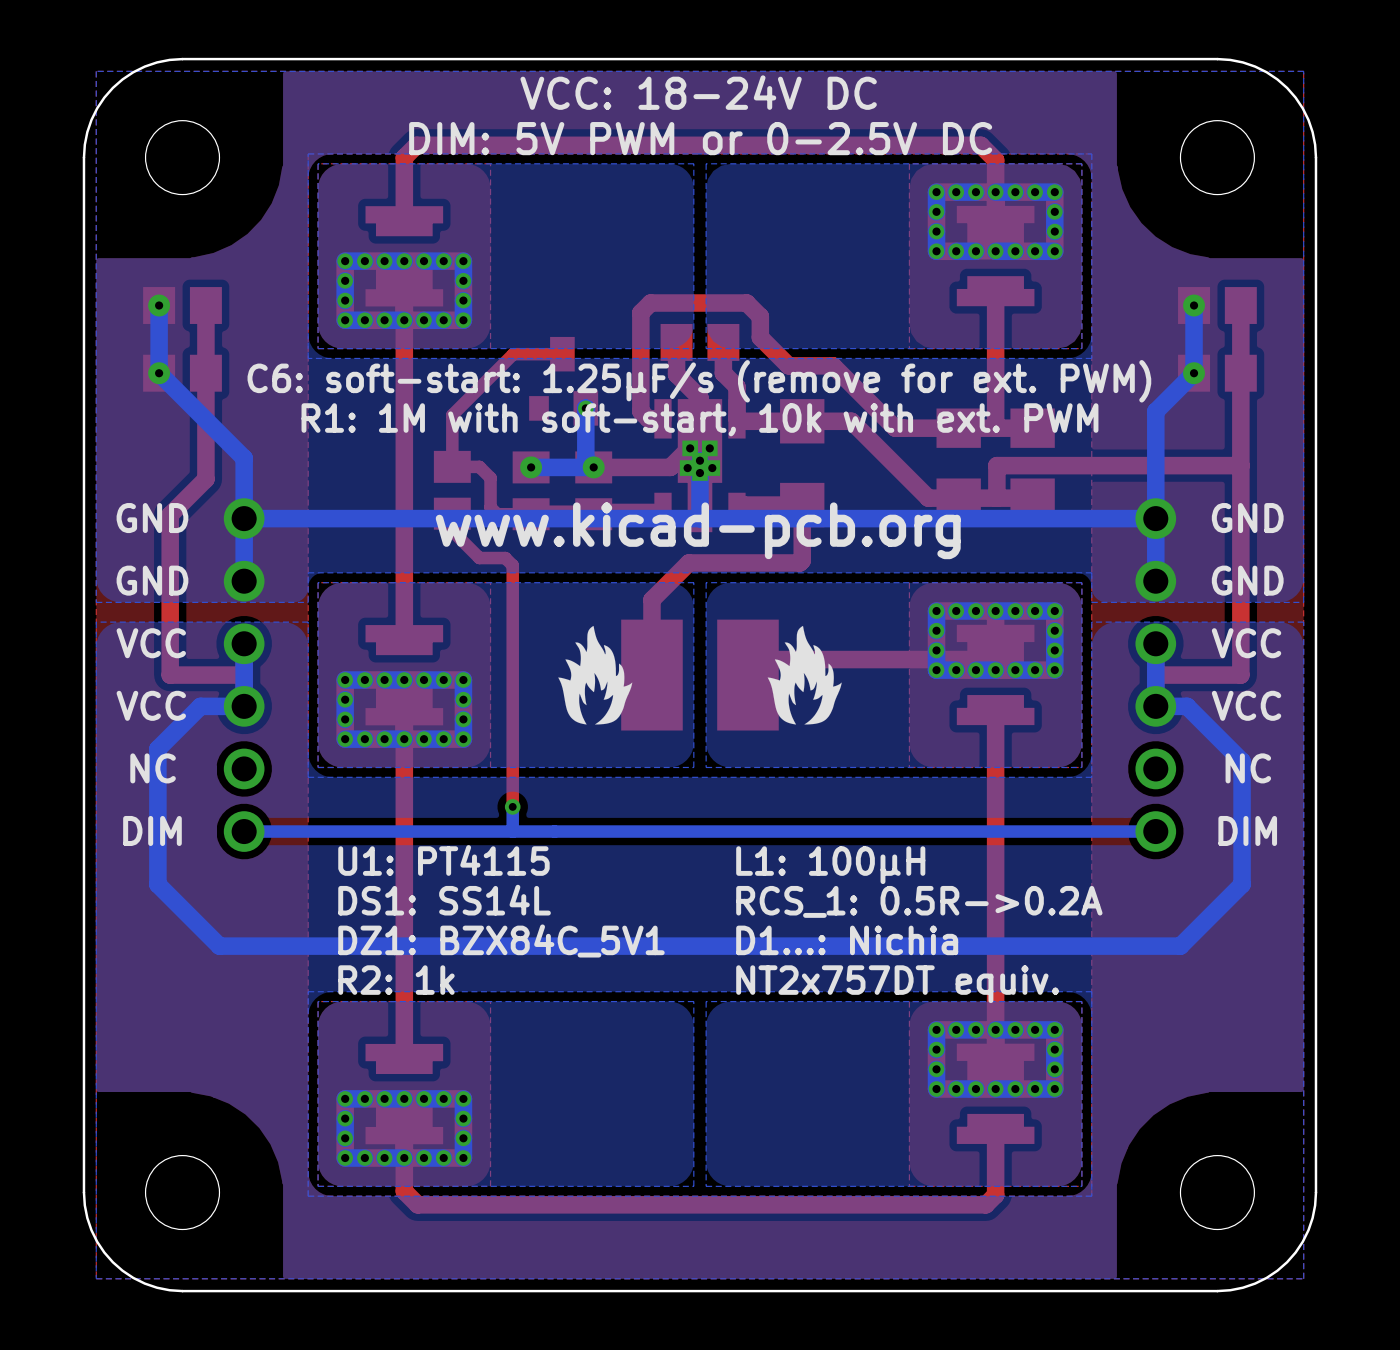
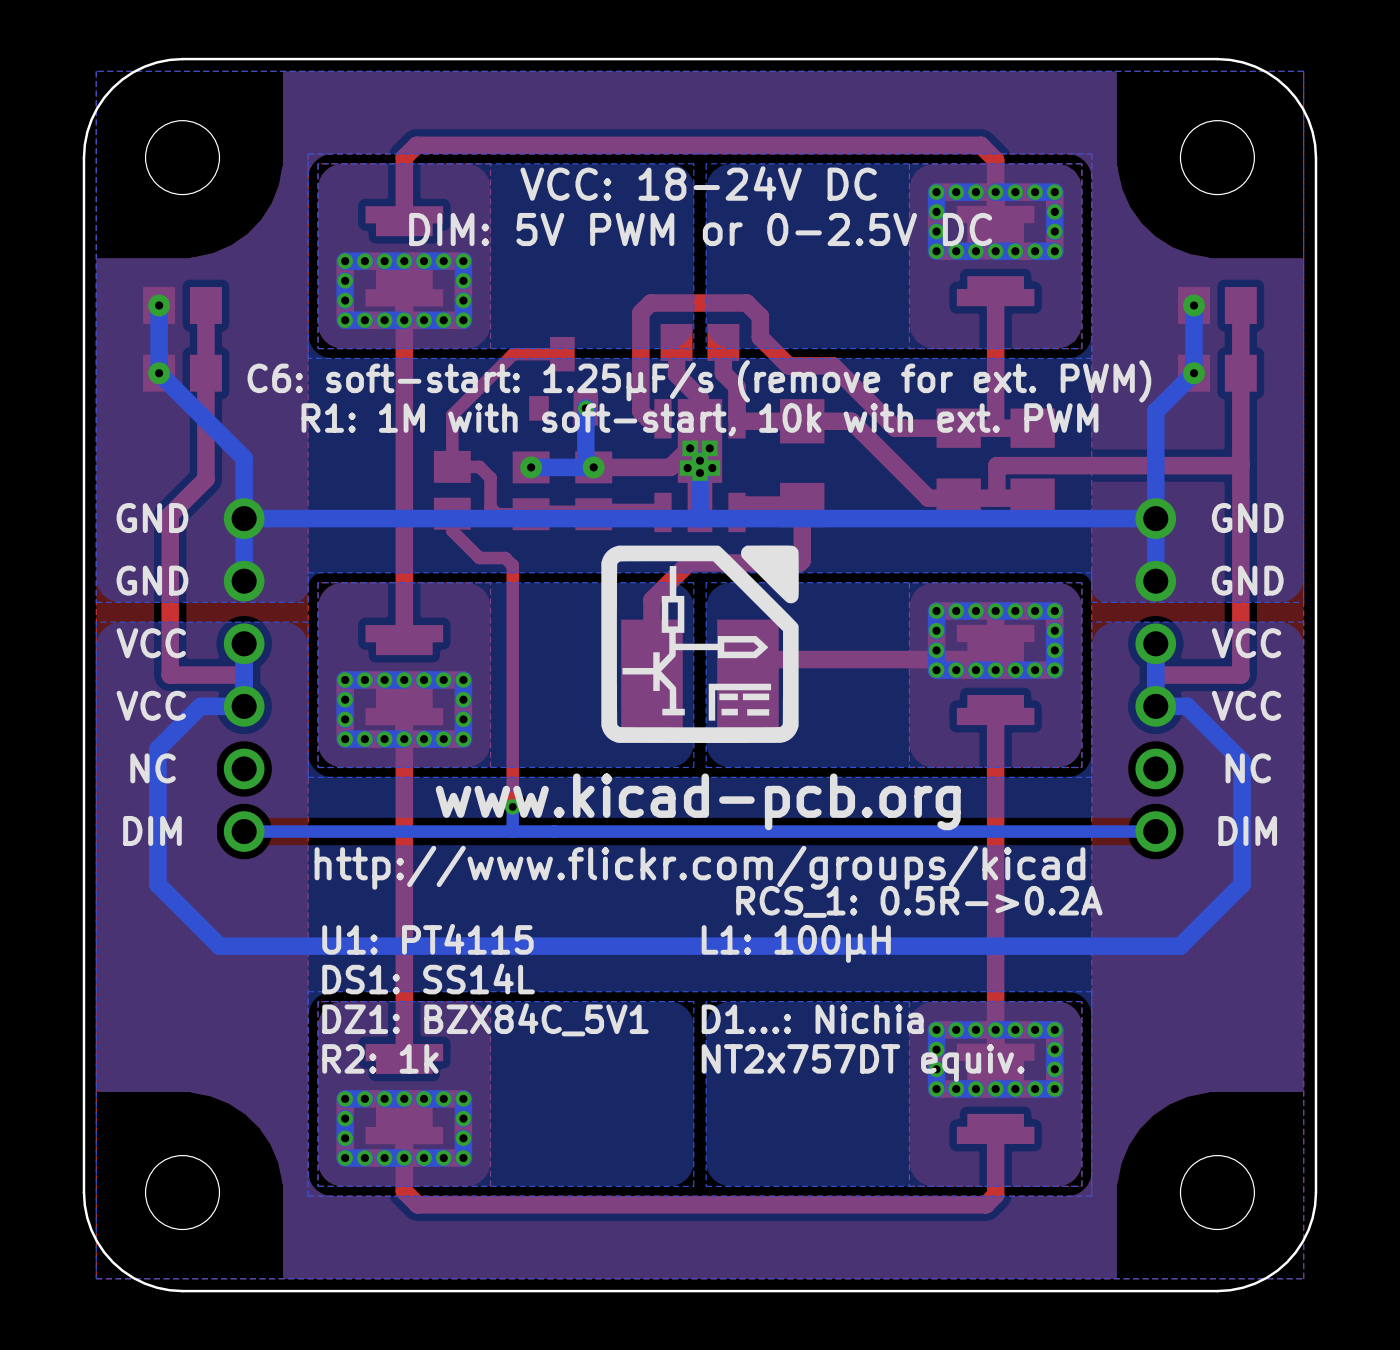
text position: VCC: 18-24V DC (698, 92) -> VCC: 18-24V DC (698, 183)
text position: DIM: 5V PWM or 0-2.5V DC (700, 138) -> DIM: 5V PWM or 0-2.5V DC (700, 229)
text position: www.kicad-pcb.org (698, 530) -> www.kicad-pcb.org (698, 801)
drawing: none -> [601, 545, 799, 744]
drawing: [558, 625, 633, 725] -> none
drawing: [767, 625, 842, 725] -> none
text position: U1: PT4115 (443, 860) -> U1: PT4115 (427, 939)
text position: L1: 100µH (830, 865) -> L1: 100µH (796, 944)
text: none -> http://www.flickr.com/groups/kicad (699, 867)
text position: DS1: SS14L (444, 900) -> DS1: SS14L (428, 978)
text position: DZ1: BZX84C_5V1 (501, 940) -> DZ1: BZX84C_5V1 (485, 1019)
text position: D1...: Nichia (847, 940) -> D1...: Nichia (812, 1019)
text position: R2: 1k (396, 980) -> R2: 1k (380, 1058)
text position: NT2x757DT equiv. (897, 984) -> NT2x757DT equiv. (863, 1063)

